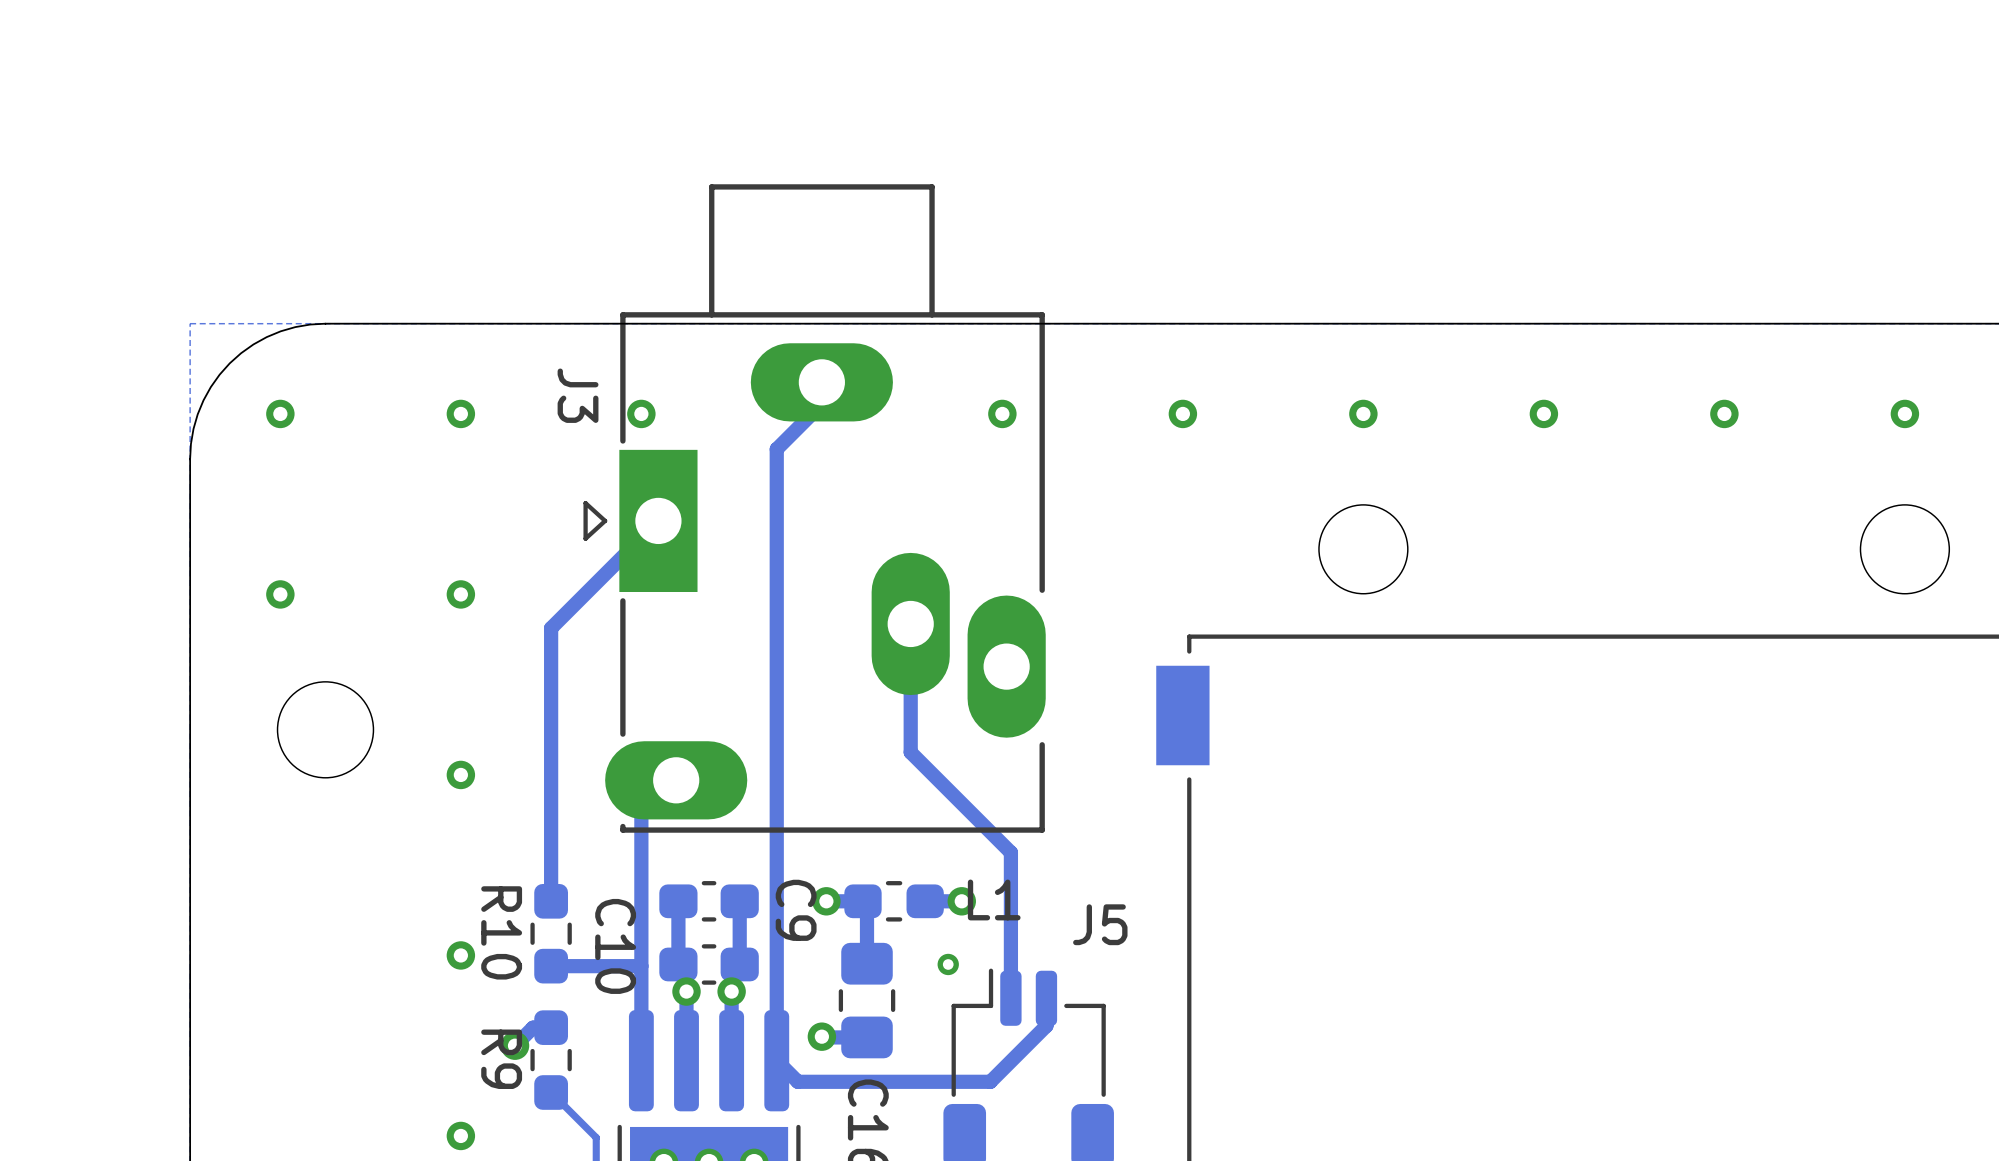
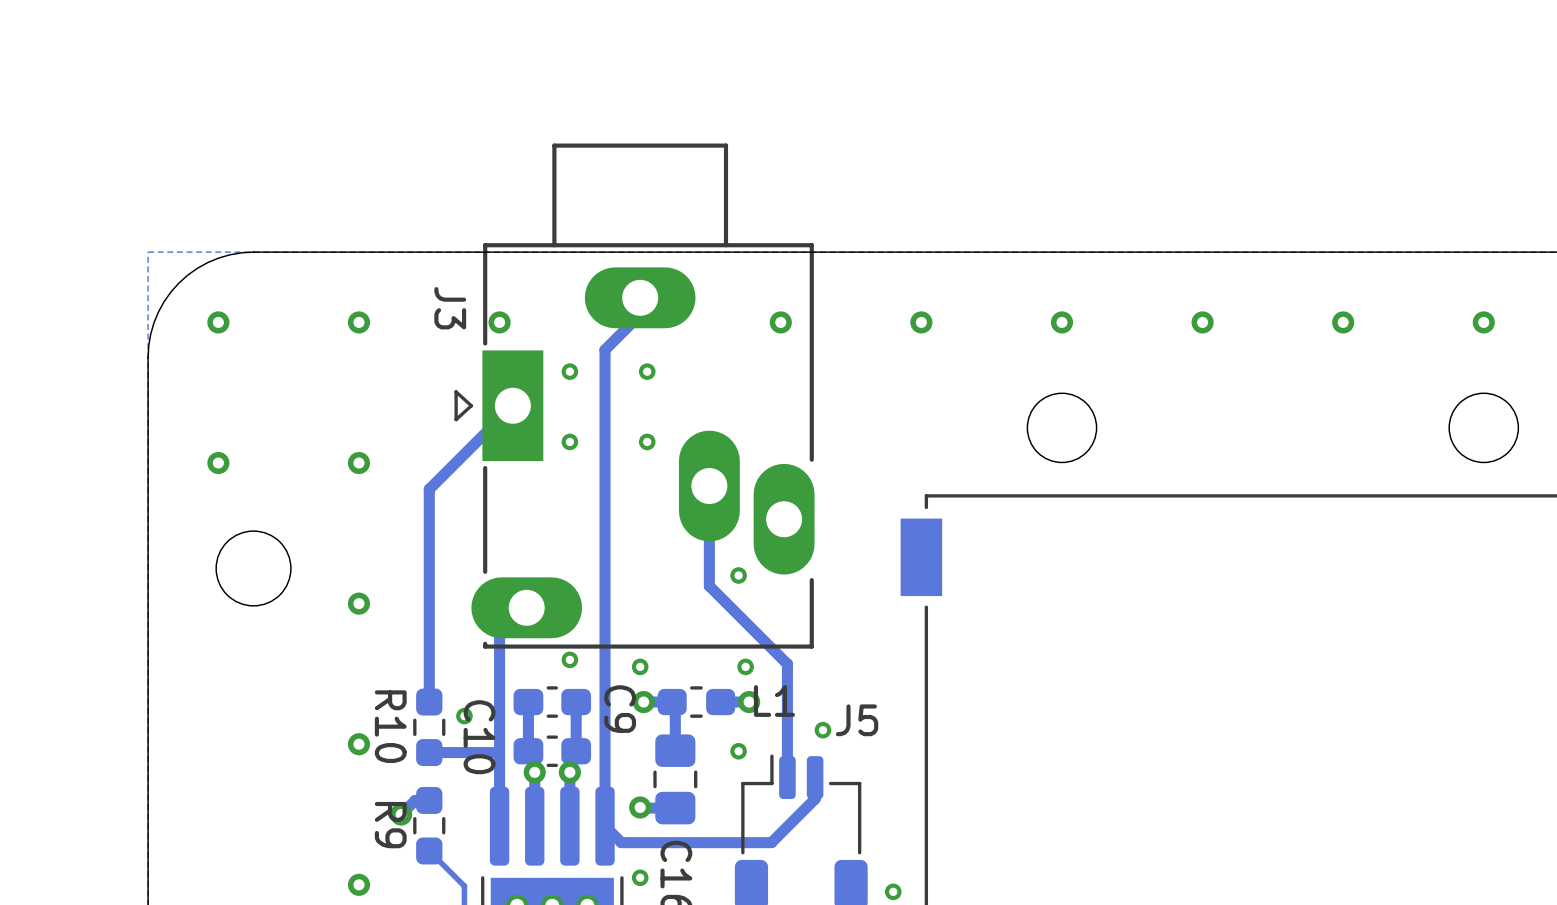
via: none -> (569, 371)
via: none -> (647, 371)
via: none -> (569, 441)
via: none -> (647, 441)
via: none -> (738, 575)
via: none -> (569, 659)
via: none -> (640, 666)
via: none -> (745, 666)
via: none -> (464, 716)
via: none -> (822, 730)
via: none -> (640, 877)
via: none -> (893, 891)

